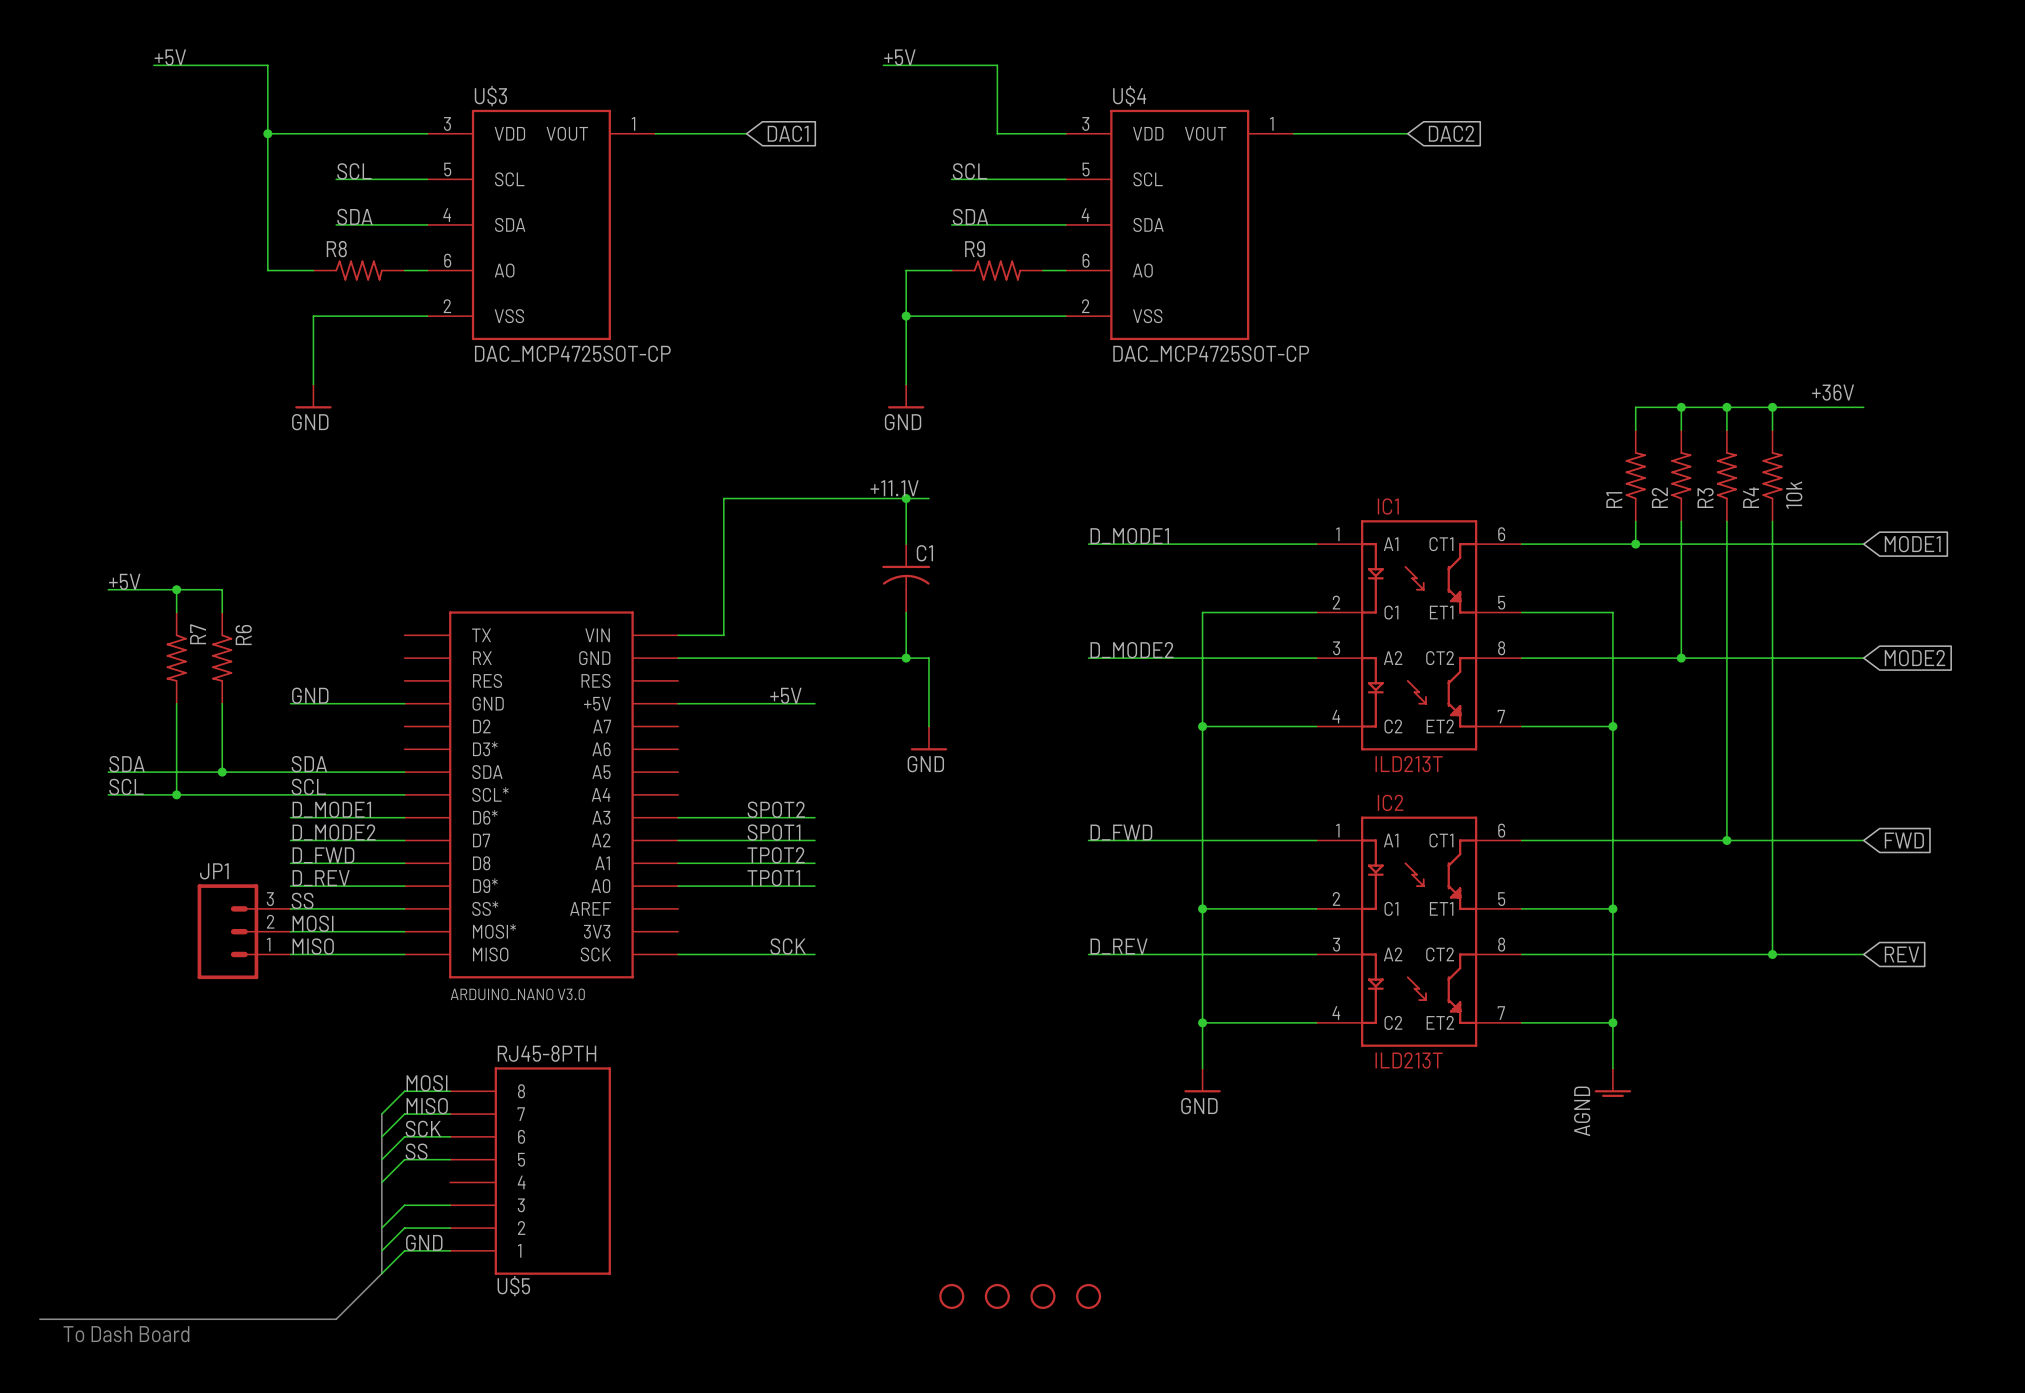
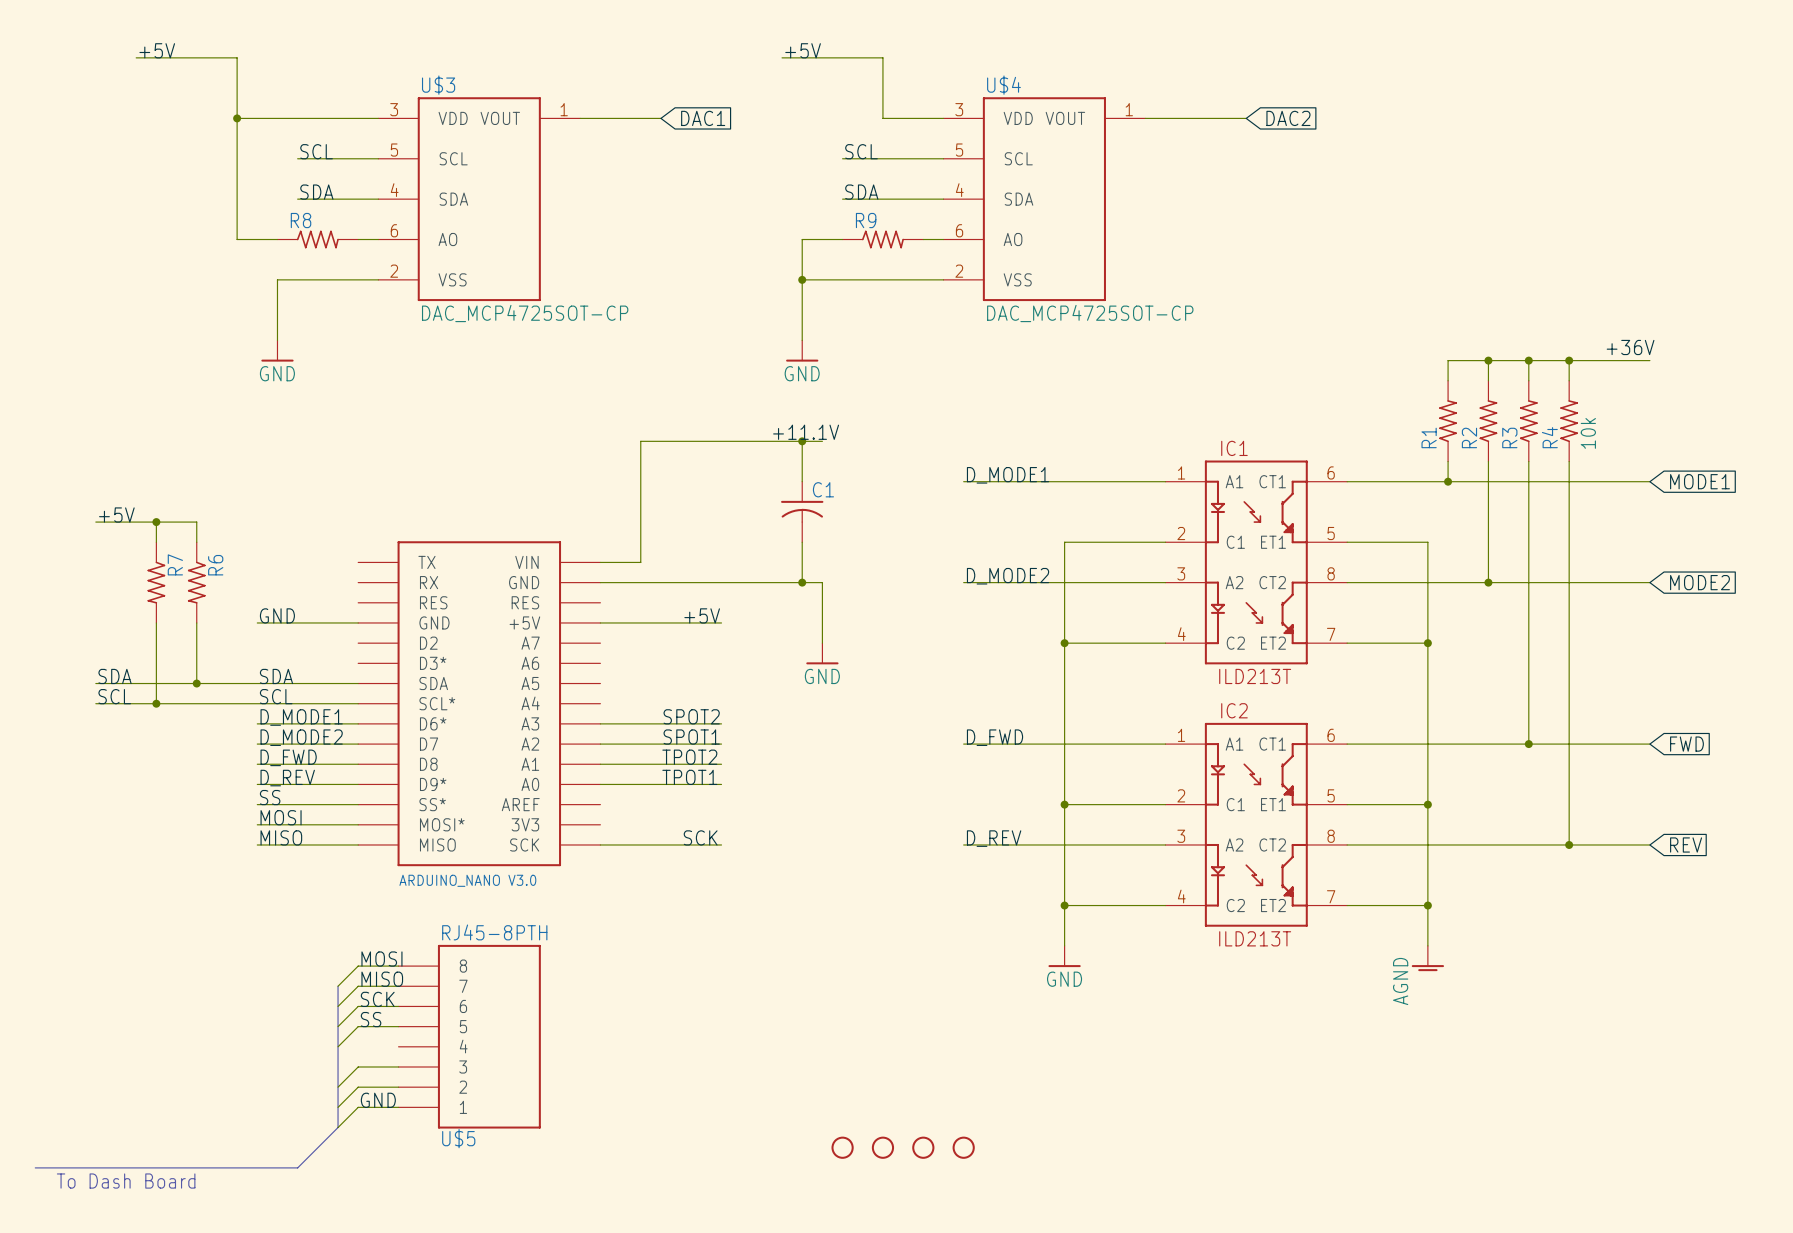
JP1: (244, 931) -> none

